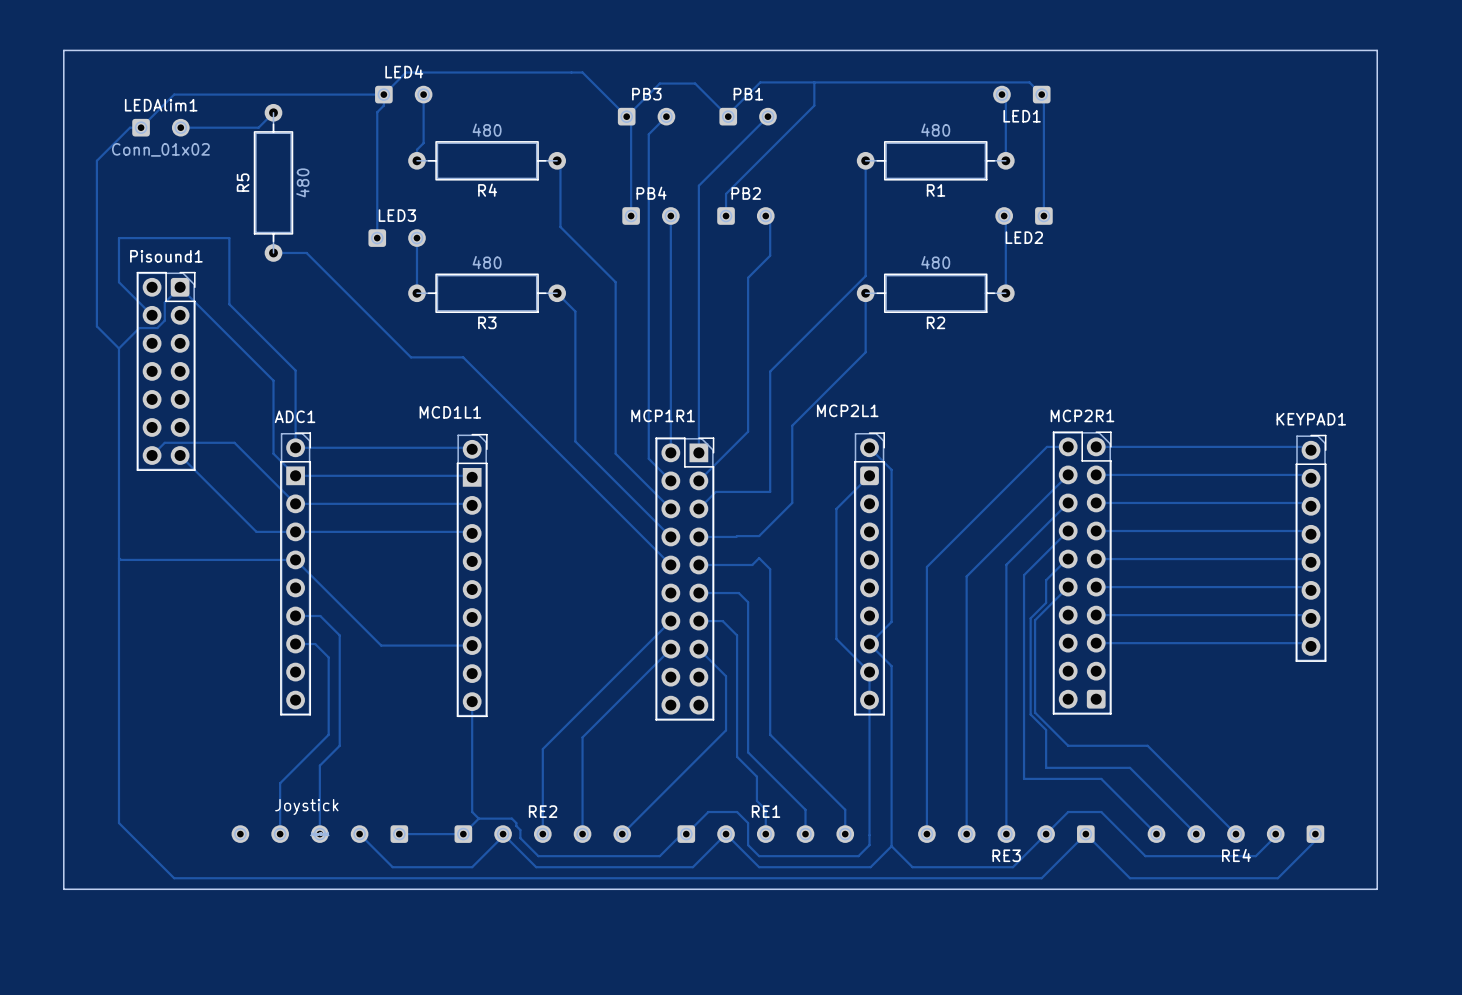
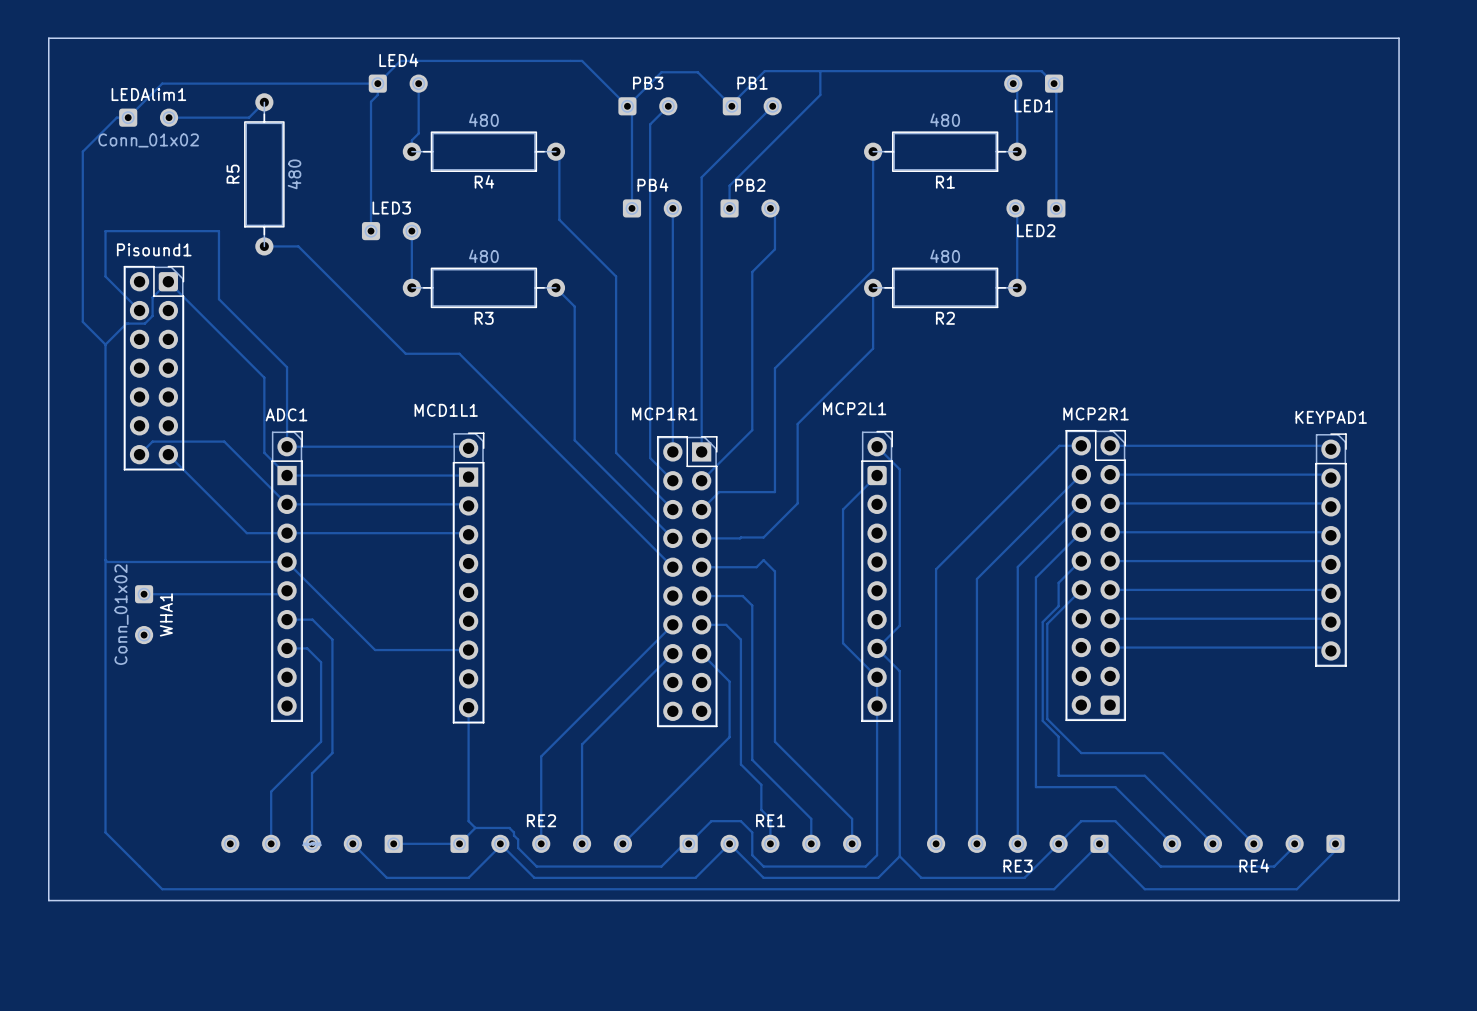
track: none -> (287, 590) (283, 594) (144, 594)
WHA1: none -> Conn_01x02 (144, 614)
text: Joystick (306, 806) -> none

